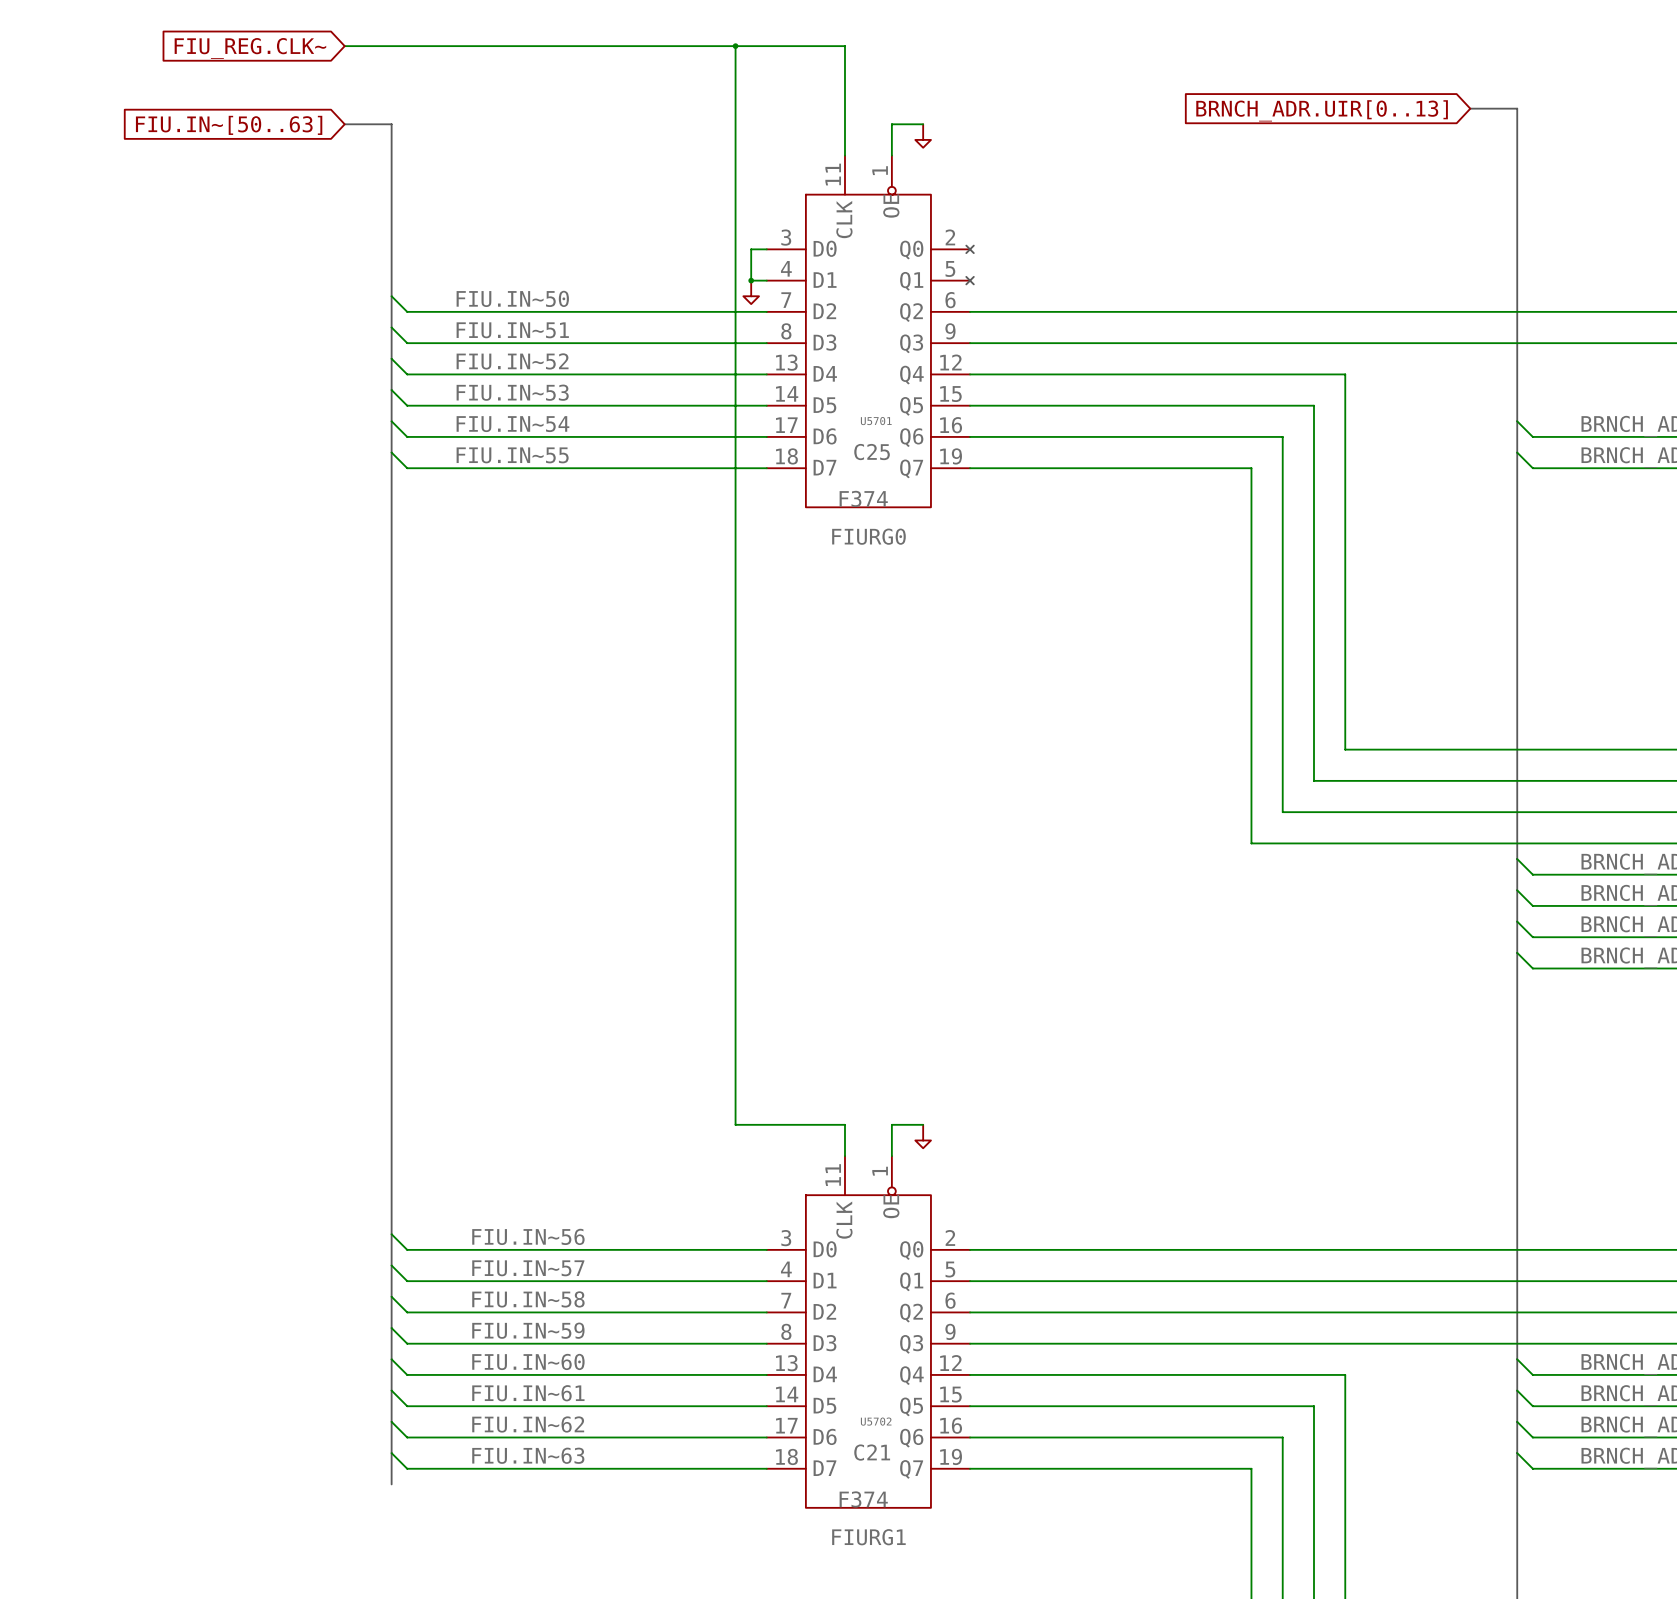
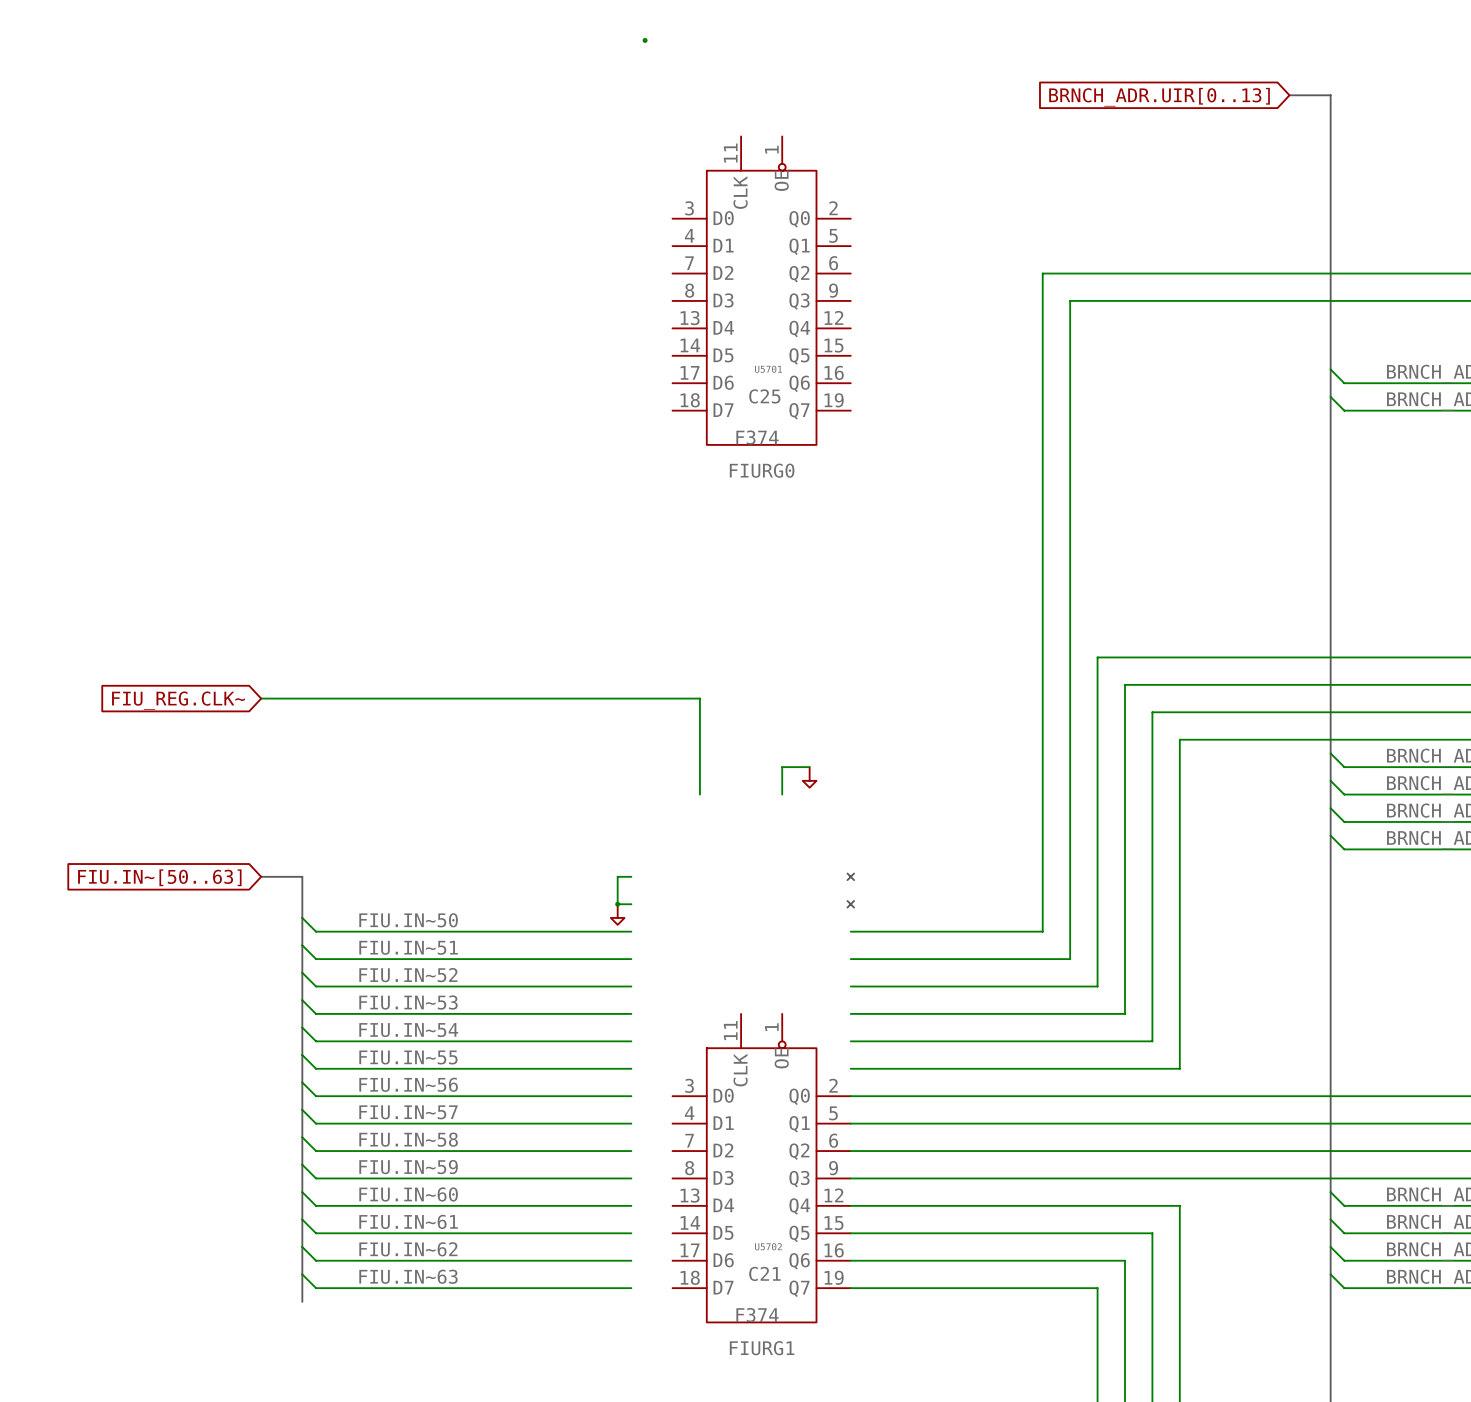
wire: (344, 46) (844, 46) (844, 155) -> none
wire: (735, 46) (735, 1124) (844, 1124) (844, 1156) -> none
global label: FIU_REG.CLK~ (250, 48) -> none
bus: (344, 124) (391, 124) (391, 1484) -> none
wire: (923, 124) (891, 124) (891, 155) -> none
global label: FIU.IN~[50..63] (229, 125) -> none
power symbol: (923, 136) -> none
wire: (766, 249) (751, 249) (751, 280) (766, 280) -> none
no-connect mark: (970, 249) -> none
junction: (751, 280) -> none
no-connect mark: (970, 280) -> none
power symbol: (751, 292) -> none
wire: (391, 296) (407, 311) (766, 311) -> none
label: FIU.IN~50 (512, 298) -> none
wire: (970, 311) (1188, 311) -> (850, 931) (1042, 931) (1042, 273)
wire: (391, 327) (407, 343) (766, 343) -> none
label: FIU.IN~51 (512, 330) -> none
wire: (970, 343) (1220, 343) -> (850, 959) (1070, 959) (1070, 300)
wire: (391, 358) (407, 374) (766, 374) -> none
label: FIU.IN~52 (512, 361) -> none
wire: (970, 374) (1345, 374) (1345, 749) -> (1097, 657) (1179, 657)
wire: (391, 390) (407, 405) (766, 405) -> none
label: FIU.IN~53 (512, 392) -> none
wire: (970, 405) (1313, 405) (1313, 780) -> none
wire: (391, 421) (407, 436) (766, 436) -> none
label: FIU.IN~54 (512, 424) -> none
wire: (970, 436) (1282, 436) (1282, 780) -> (1152, 684) (1124, 684)
wire: (391, 452) (407, 468) (766, 468) -> none
label: FIU.IN~55 (512, 455) -> none
wire: (970, 468) (1251, 468) (1251, 749) -> none
wire: none -> (261, 698) (699, 698) (699, 794)
global label: none -> FIU_REG.CLK~ (178, 700)
wire: (1282, 812) (1313, 812) -> (1124, 712) (1124, 1013) (850, 1013)
wire: none -> (1152, 712) (1152, 1041) (850, 1041)
wire: (1251, 843) (1345, 843) -> (850, 1068) (1179, 1068) (1179, 739)
wire: none -> (1097, 739) (1097, 986) (850, 986)
wire: none -> (809, 767) (782, 767) (782, 794)
power symbol: none -> (809, 777)
bus: none -> (261, 876) (302, 876) (302, 1301)
wire: none -> (631, 876) (617, 876) (617, 904) (631, 904)
no-connect mark: none -> (850, 876)
global label: none -> FIU.IN~[50..63] (159, 877)
junction: none -> (617, 904)
no-connect mark: none -> (850, 904)
power symbol: none -> (617, 914)
wire: none -> (302, 917) (316, 931) (631, 931)
label: none -> FIU.IN~50 (408, 920)
wire: none -> (302, 945) (316, 959) (631, 959)
label: none -> FIU.IN~51 (408, 947)
wire: none -> (302, 972) (316, 986) (631, 986)
label: none -> FIU.IN~52 (408, 975)
wire: (923, 1124) (891, 1124) (891, 1156) -> none
power symbol: (923, 1136) -> none
wire: none -> (302, 1000) (316, 1013) (631, 1013)
label: none -> FIU.IN~53 (408, 1002)
wire: none -> (302, 1027) (316, 1041) (631, 1041)
label: none -> FIU.IN~54 (408, 1030)
wire: none -> (302, 1055) (316, 1068) (631, 1068)
label: none -> FIU.IN~55 (408, 1057)
wire: (391, 1234) (407, 1249) -> (302, 1082) (316, 1096) (357, 1096)
label position: FIU.IN~56 (528, 1236) -> FIU.IN~56 (408, 1084)
wire: (719, 1249) (766, 1249) -> none
wire: (391, 1265) (407, 1281) -> (302, 1109) (316, 1123) (357, 1123)
label position: FIU.IN~57 (528, 1268) -> FIU.IN~57 (408, 1112)
wire: (719, 1281) (766, 1281) -> none
wire: (391, 1296) (407, 1312) -> (302, 1137) (316, 1151) (357, 1151)
label position: FIU.IN~58 (528, 1299) -> FIU.IN~58 (408, 1139)
wire: (719, 1312) (766, 1312) -> none
wire: (391, 1328) (407, 1343) -> (302, 1164) (316, 1178) (357, 1178)
label position: FIU.IN~59 (528, 1330) -> FIU.IN~59 (408, 1167)
wire: (719, 1343) (766, 1343) -> none
wire: (391, 1359) (407, 1374) -> (302, 1192) (316, 1205) (357, 1205)
label position: FIU.IN~60 (528, 1361) -> FIU.IN~60 (408, 1194)
wire: (719, 1374) (766, 1374) -> none
wire: (391, 1390) (407, 1406) -> (302, 1219) (316, 1233) (357, 1233)
label position: FIU.IN~61 (528, 1393) -> FIU.IN~61 (408, 1221)
wire: (719, 1406) (766, 1406) -> none
wire: (391, 1421) (407, 1437) -> (302, 1247) (316, 1260) (357, 1260)
label position: FIU.IN~62 (528, 1424) -> FIU.IN~62 (408, 1249)
wire: (719, 1437) (766, 1437) -> none
wire: (391, 1453) (407, 1468) -> (302, 1274) (316, 1288) (357, 1288)
label position: FIU.IN~63 (528, 1455) -> FIU.IN~63 (408, 1276)
wire: (719, 1468) (766, 1468) -> none

